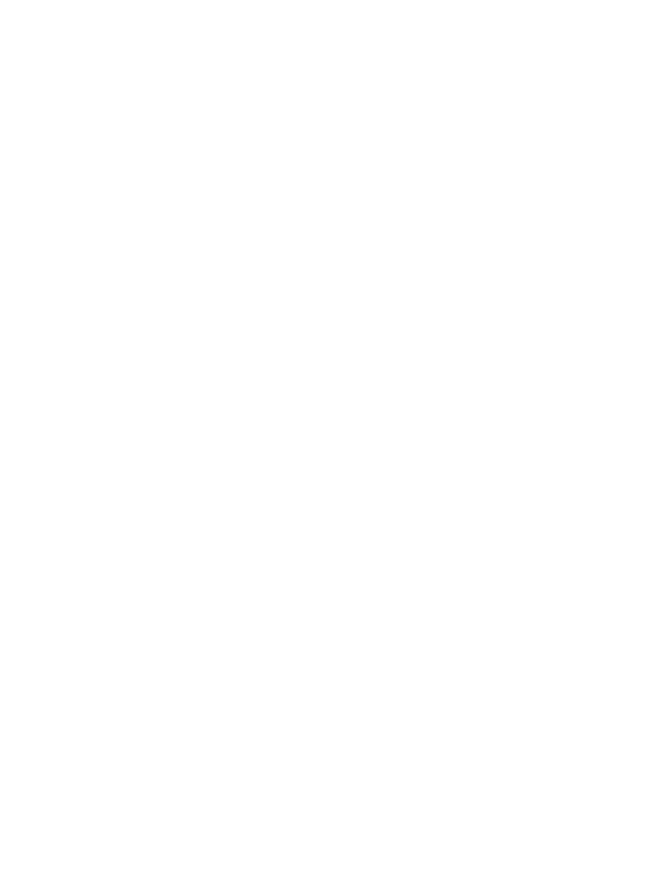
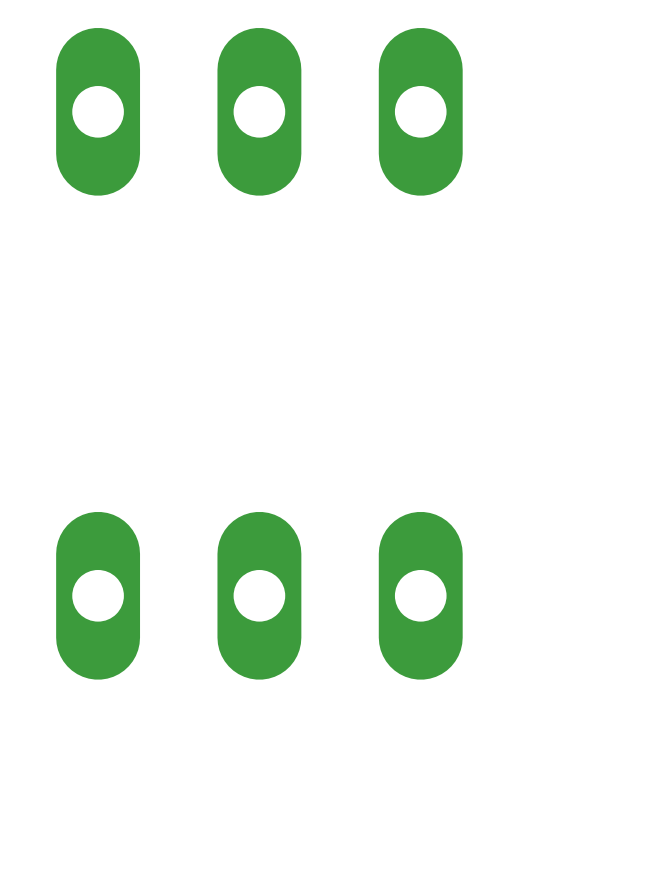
part: none -> (259, 111)
part: none -> (259, 595)

